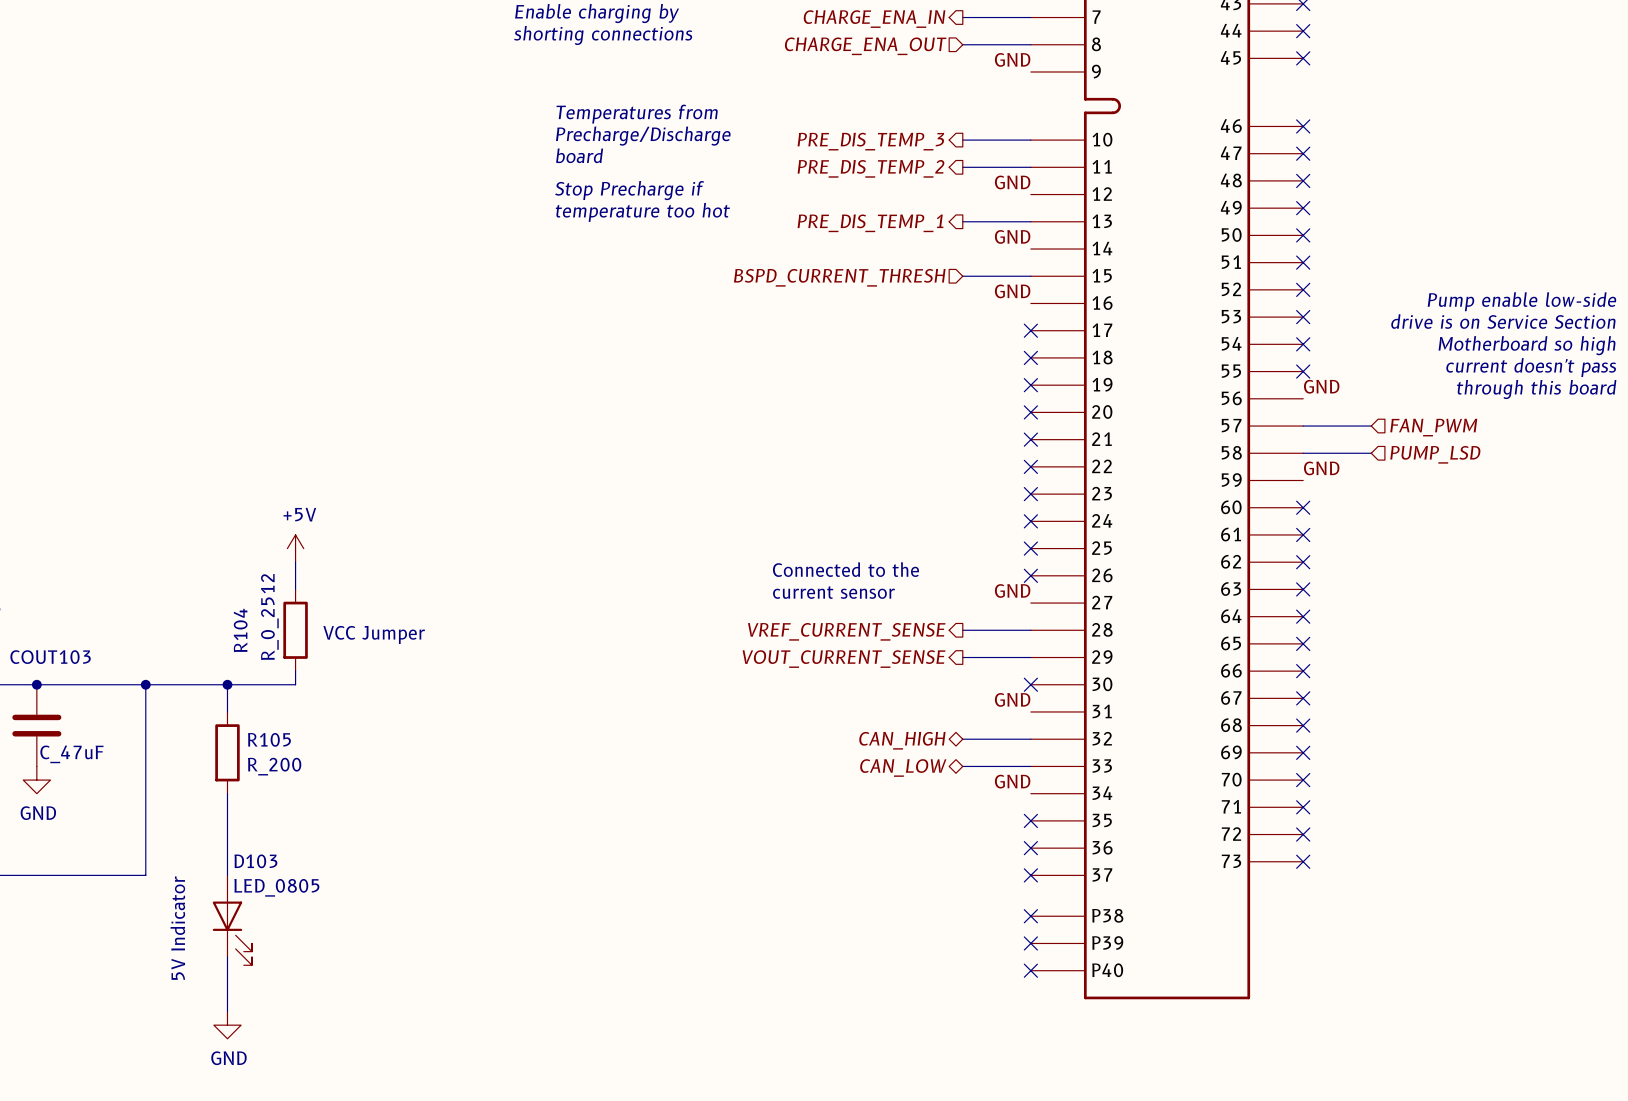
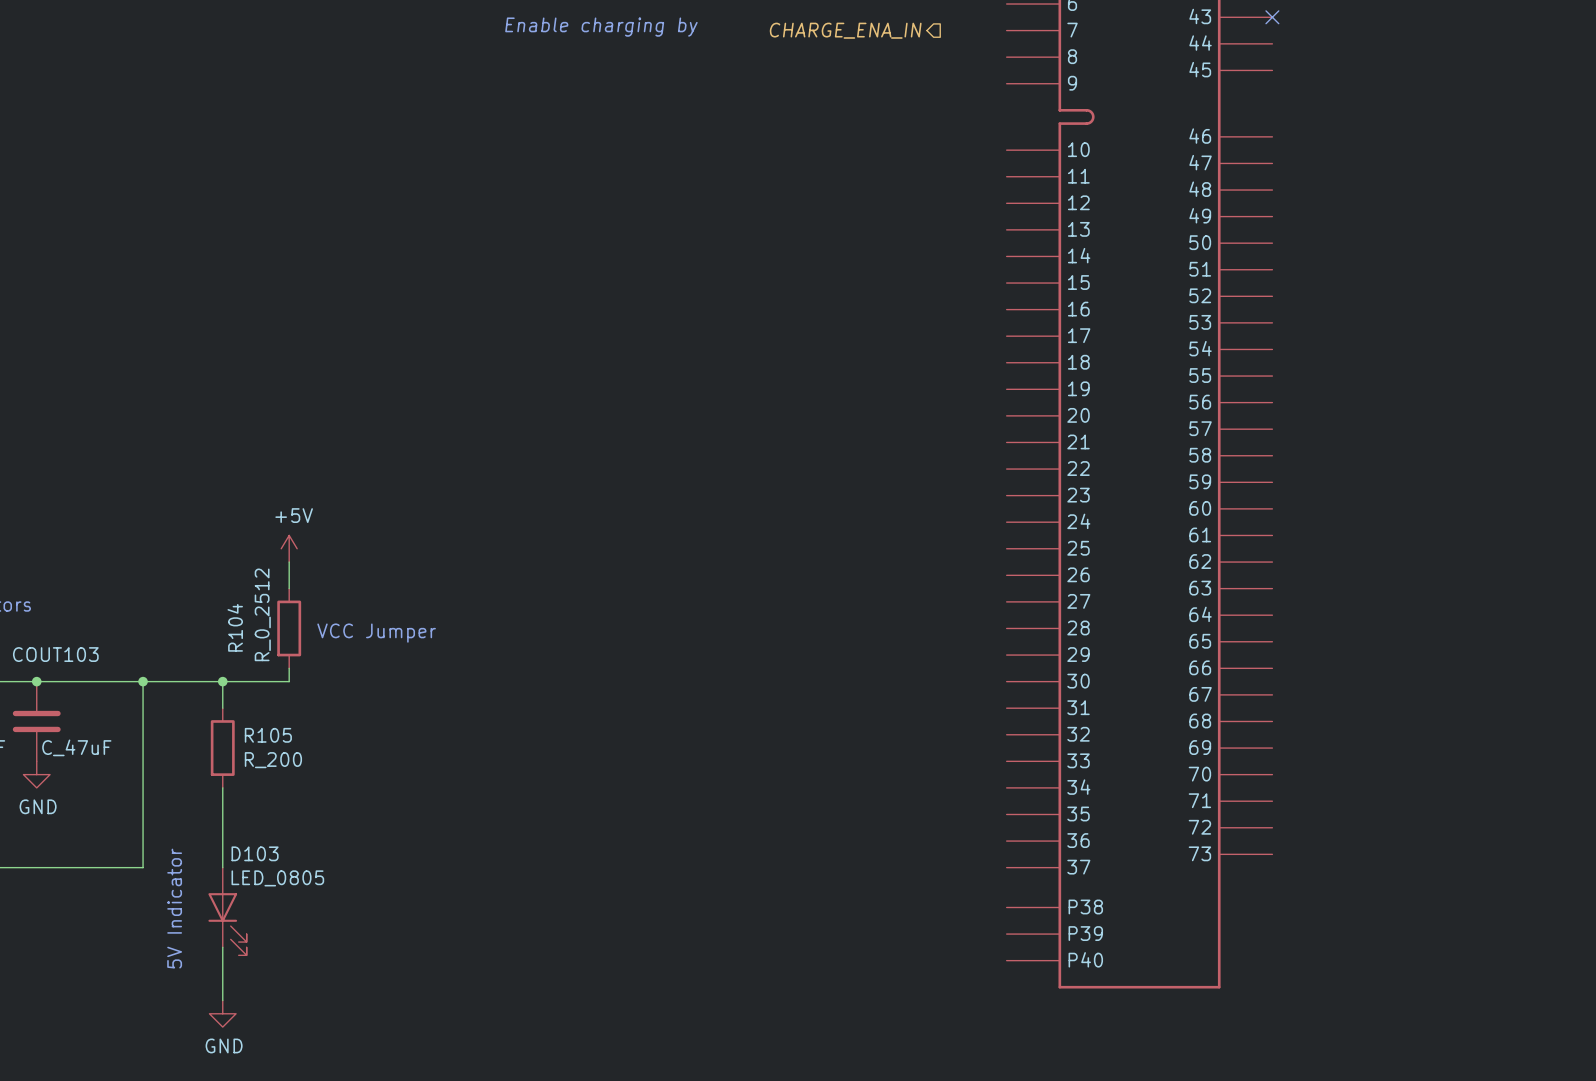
wire: (962, 17) (1030, 17) -> none
no-connect mark: (1303, 31) -> none
text: shorting connections (603, 35) -> none
wire: (962, 44) (1030, 44) -> none
hierarchical label: CHARGE_ENA_OUT (865, 46) -> none
no-connect mark: (1303, 58) -> none
label: GND (1012, 59) -> none
text: Temperatures from (637, 114) -> none
no-connect mark: (1303, 126) -> none
text: Precharge/Discharge (643, 136) -> none
wire: (962, 140) (1030, 140) -> none
hierarchical label: PRE_DIS_TEMP_3 (870, 141) -> none
no-connect mark: (1303, 153) -> none
text: board (579, 155) -> none
wire: (962, 167) (1030, 167) -> none
hierarchical label: PRE_DIS_TEMP_2 (870, 168) -> none
no-connect mark: (1303, 180) -> none
label: GND (1012, 182) -> none
text: Stop Precharge if (629, 190) -> none
no-connect mark: (1303, 208) -> none
text: temperature too hot (642, 212) -> none
wire: (962, 221) (1030, 221) -> none
hierarchical label: PRE_DIS_TEMP_1 (870, 223) -> none
no-connect mark: (1303, 235) -> none
label: GND (1012, 236) -> none
no-connect mark: (1303, 262) -> none
wire: (962, 276) (1030, 276) -> none
hierarchical label: BSPD_CURRENT_THRESH (839, 277) -> none
no-connect mark: (1303, 289) -> none
label: GND (1012, 291) -> none
text: Pump enable low-side (1521, 301) -> none
no-connect mark: (1303, 317) -> none
text: drive is on Service Section (1503, 321) -> none
no-connect mark: (1030, 330) -> none
no-connect mark: (1303, 344) -> none
text: Motherboard so high (1527, 345) -> none
no-connect mark: (1030, 357) -> none
text: current doesn't pass (1531, 367) -> none
no-connect mark: (1303, 371) -> none
no-connect mark: (1030, 385) -> none
label: GND (1321, 386) -> none
text: through this board (1536, 389) -> none
no-connect mark: (1030, 412) -> none
wire: (1303, 426) (1371, 426) -> none
hierarchical label: FAN_PWM (1433, 427) -> none
no-connect mark: (1030, 439) -> none
wire: (1303, 453) (1371, 453) -> none
hierarchical label: PUMP_LSD (1435, 454) -> none
no-connect mark: (1030, 466) -> none
label: GND (1321, 468) -> none
no-connect mark: (1030, 494) -> none
no-connect mark: (1303, 507) -> none
no-connect mark: (1030, 521) -> none
no-connect mark: (1303, 534) -> none
no-connect mark: (1030, 548) -> none
no-connect mark: (1303, 562) -> none
text: Connected to the (845, 569) -> none
no-connect mark: (1030, 575) -> none
no-connect mark: (1303, 589) -> none
label: GND (1012, 590) -> none
text: current sensor (833, 592) -> none
no-connect mark: (1303, 616) -> none
wire: (962, 630) (1030, 630) -> none
hierarchical label: VREF_CURRENT_SENSE (846, 631) -> none
no-connect mark: (1303, 643) -> none
wire: (962, 657) (1030, 657) -> none
hierarchical label: VOUT_CURRENT_SENSE (844, 659) -> none
no-connect mark: (1303, 671) -> none
no-connect mark: (1030, 684) -> none
no-connect mark: (1303, 698) -> none
label: GND (1012, 699) -> none
no-connect mark: (1303, 725) -> none
wire: (962, 739) (1030, 739) -> none
hierarchical label: CAN_HIGH (902, 740) -> none
no-connect mark: (1303, 752) -> none
wire: (962, 766) (1030, 766) -> none
hierarchical label: CAN_LOW (903, 767) -> none
no-connect mark: (1303, 780) -> none
label: GND (1012, 781) -> none
no-connect mark: (1303, 807) -> none
no-connect mark: (1030, 820) -> none
no-connect mark: (1303, 834) -> none
no-connect mark: (1030, 848) -> none
no-connect mark: (1303, 861) -> none
no-connect mark: (1030, 875) -> none
no-connect mark: (1030, 916) -> none
no-connect mark: (1030, 943) -> none
no-connect mark: (1030, 970) -> none

